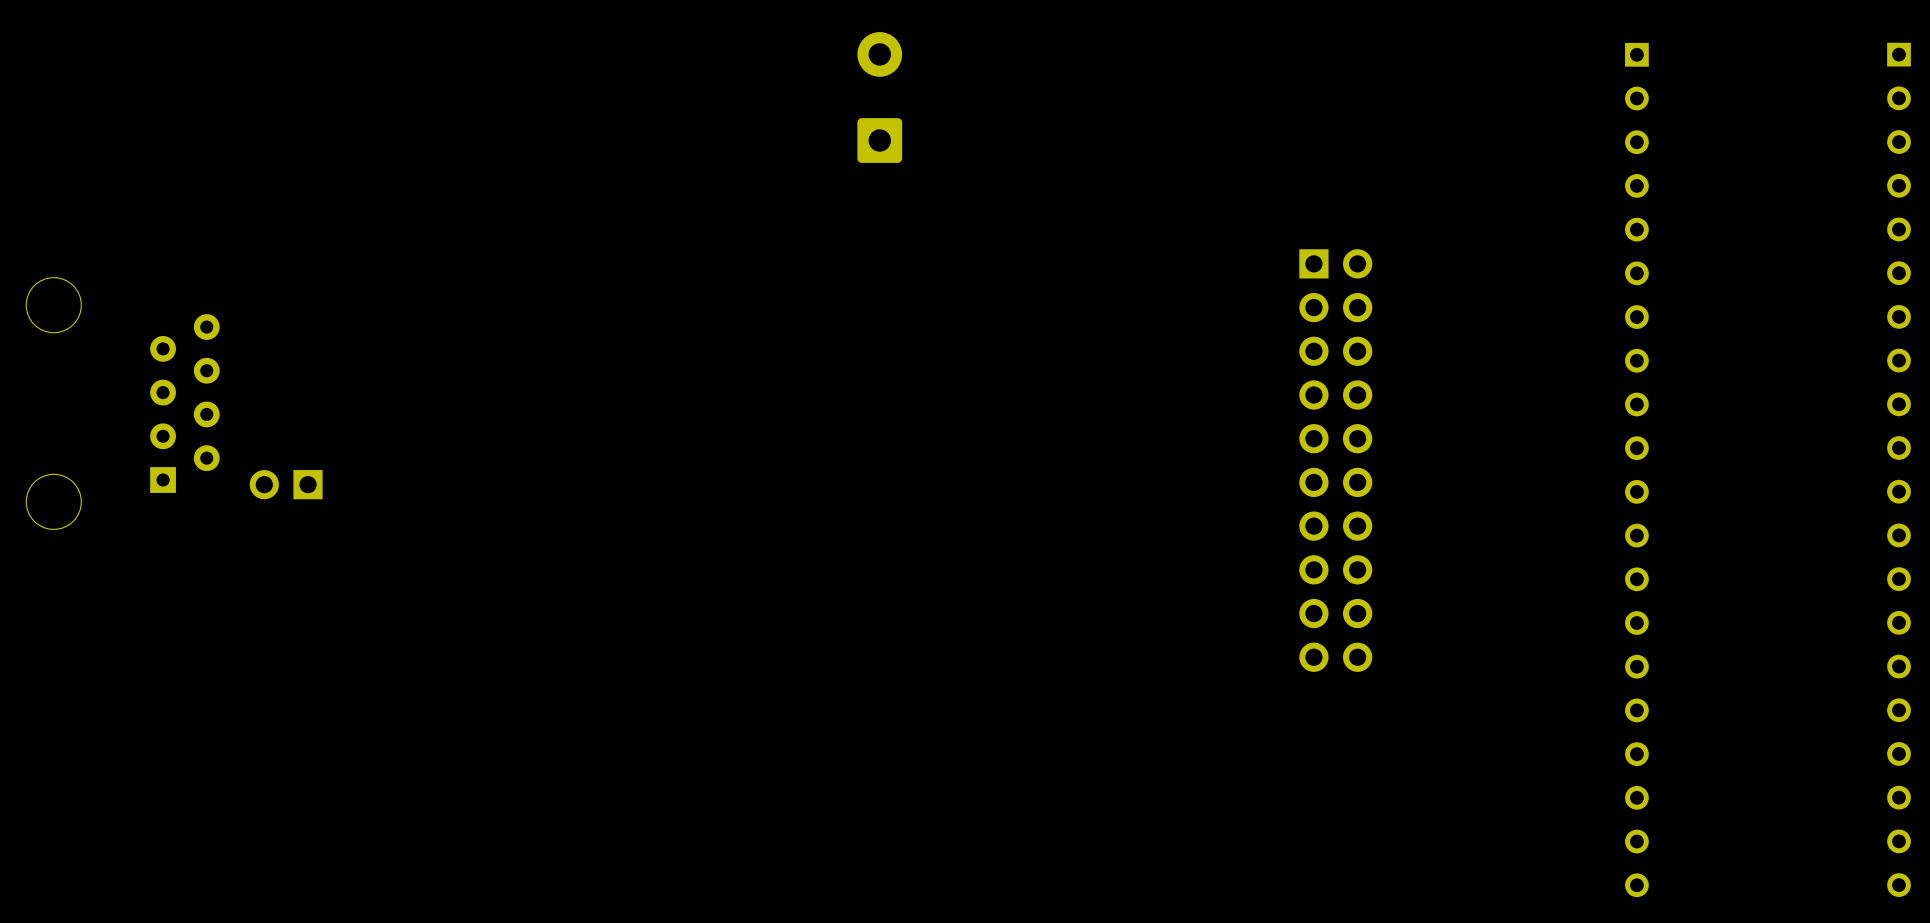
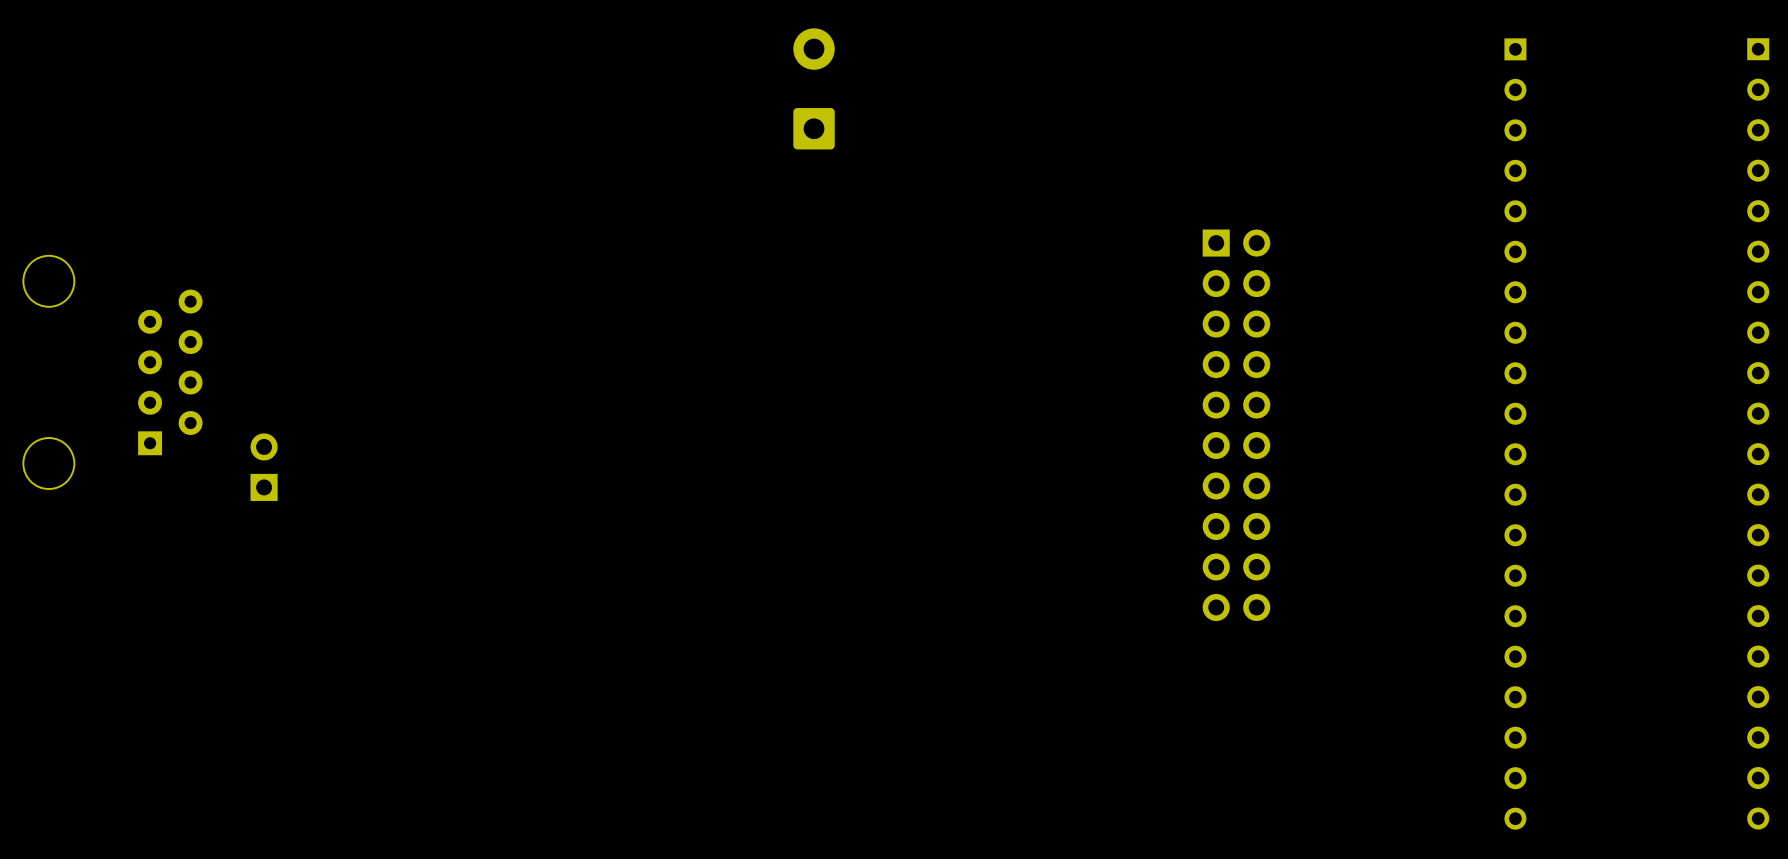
part rotation: 0° (286, 484) -> 90° clockwise (264, 467)

